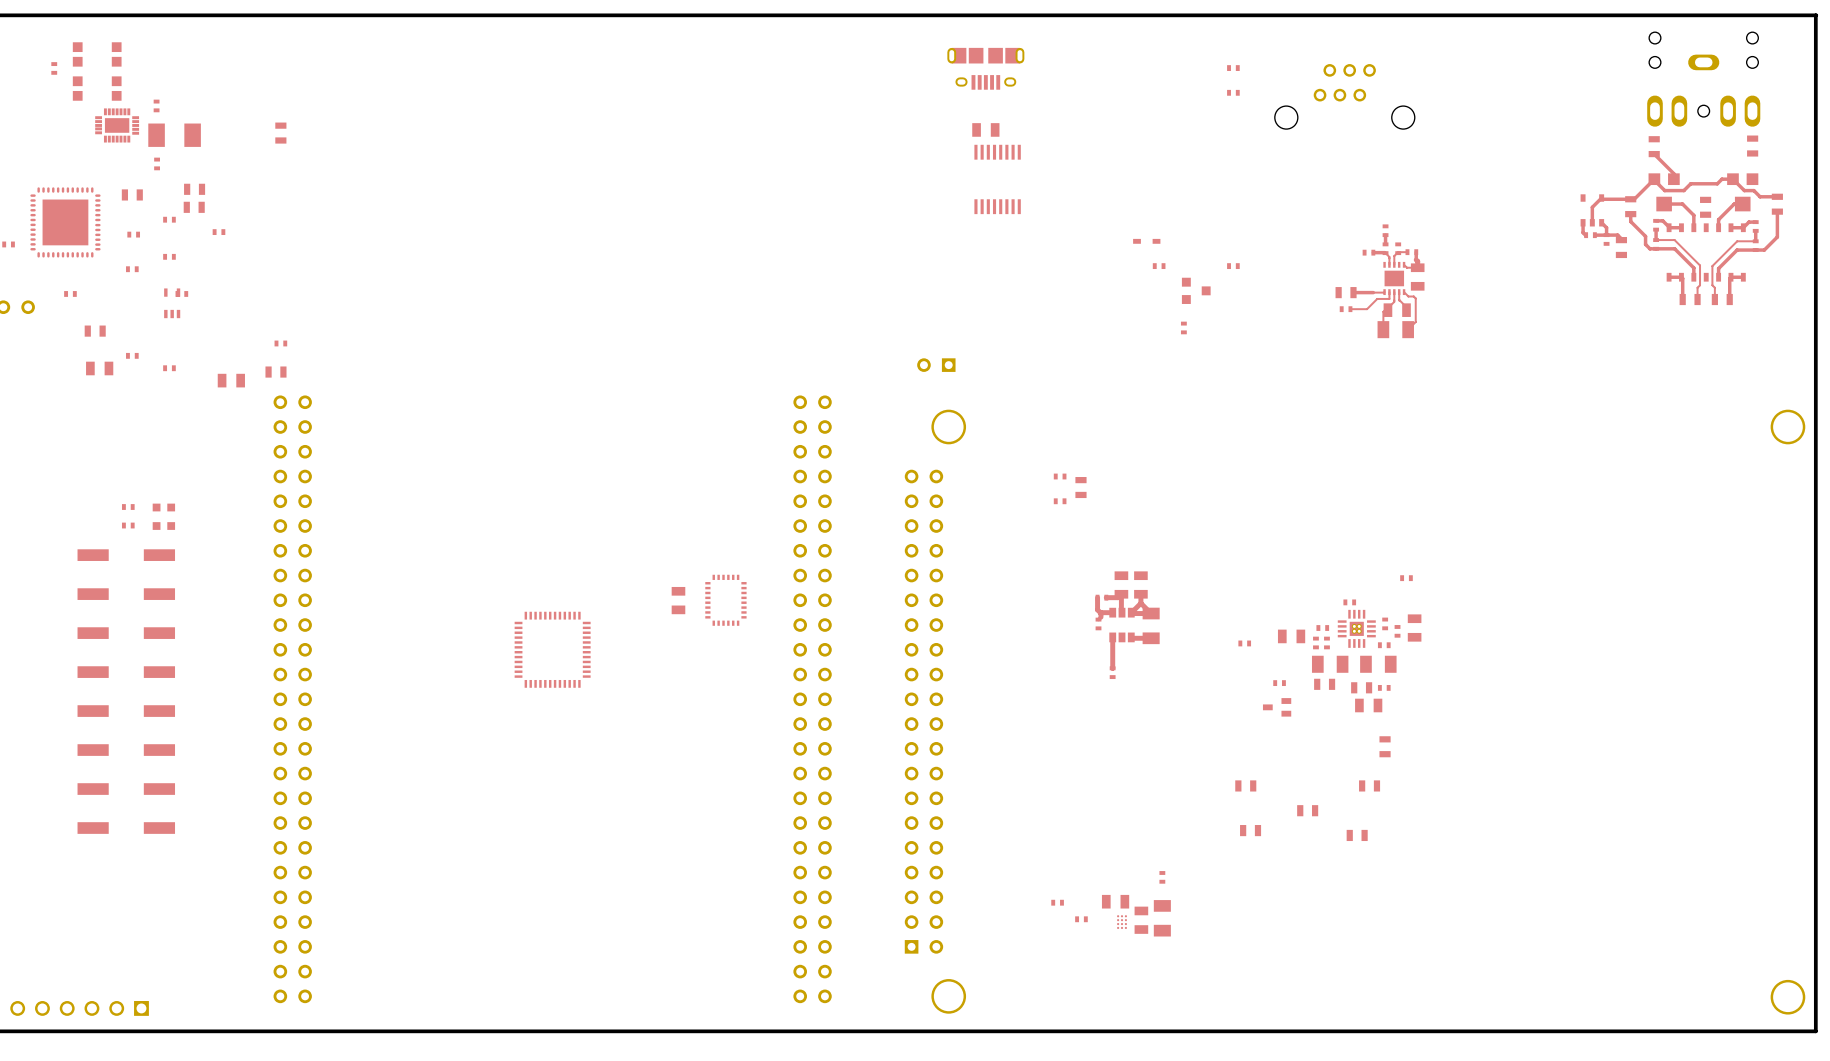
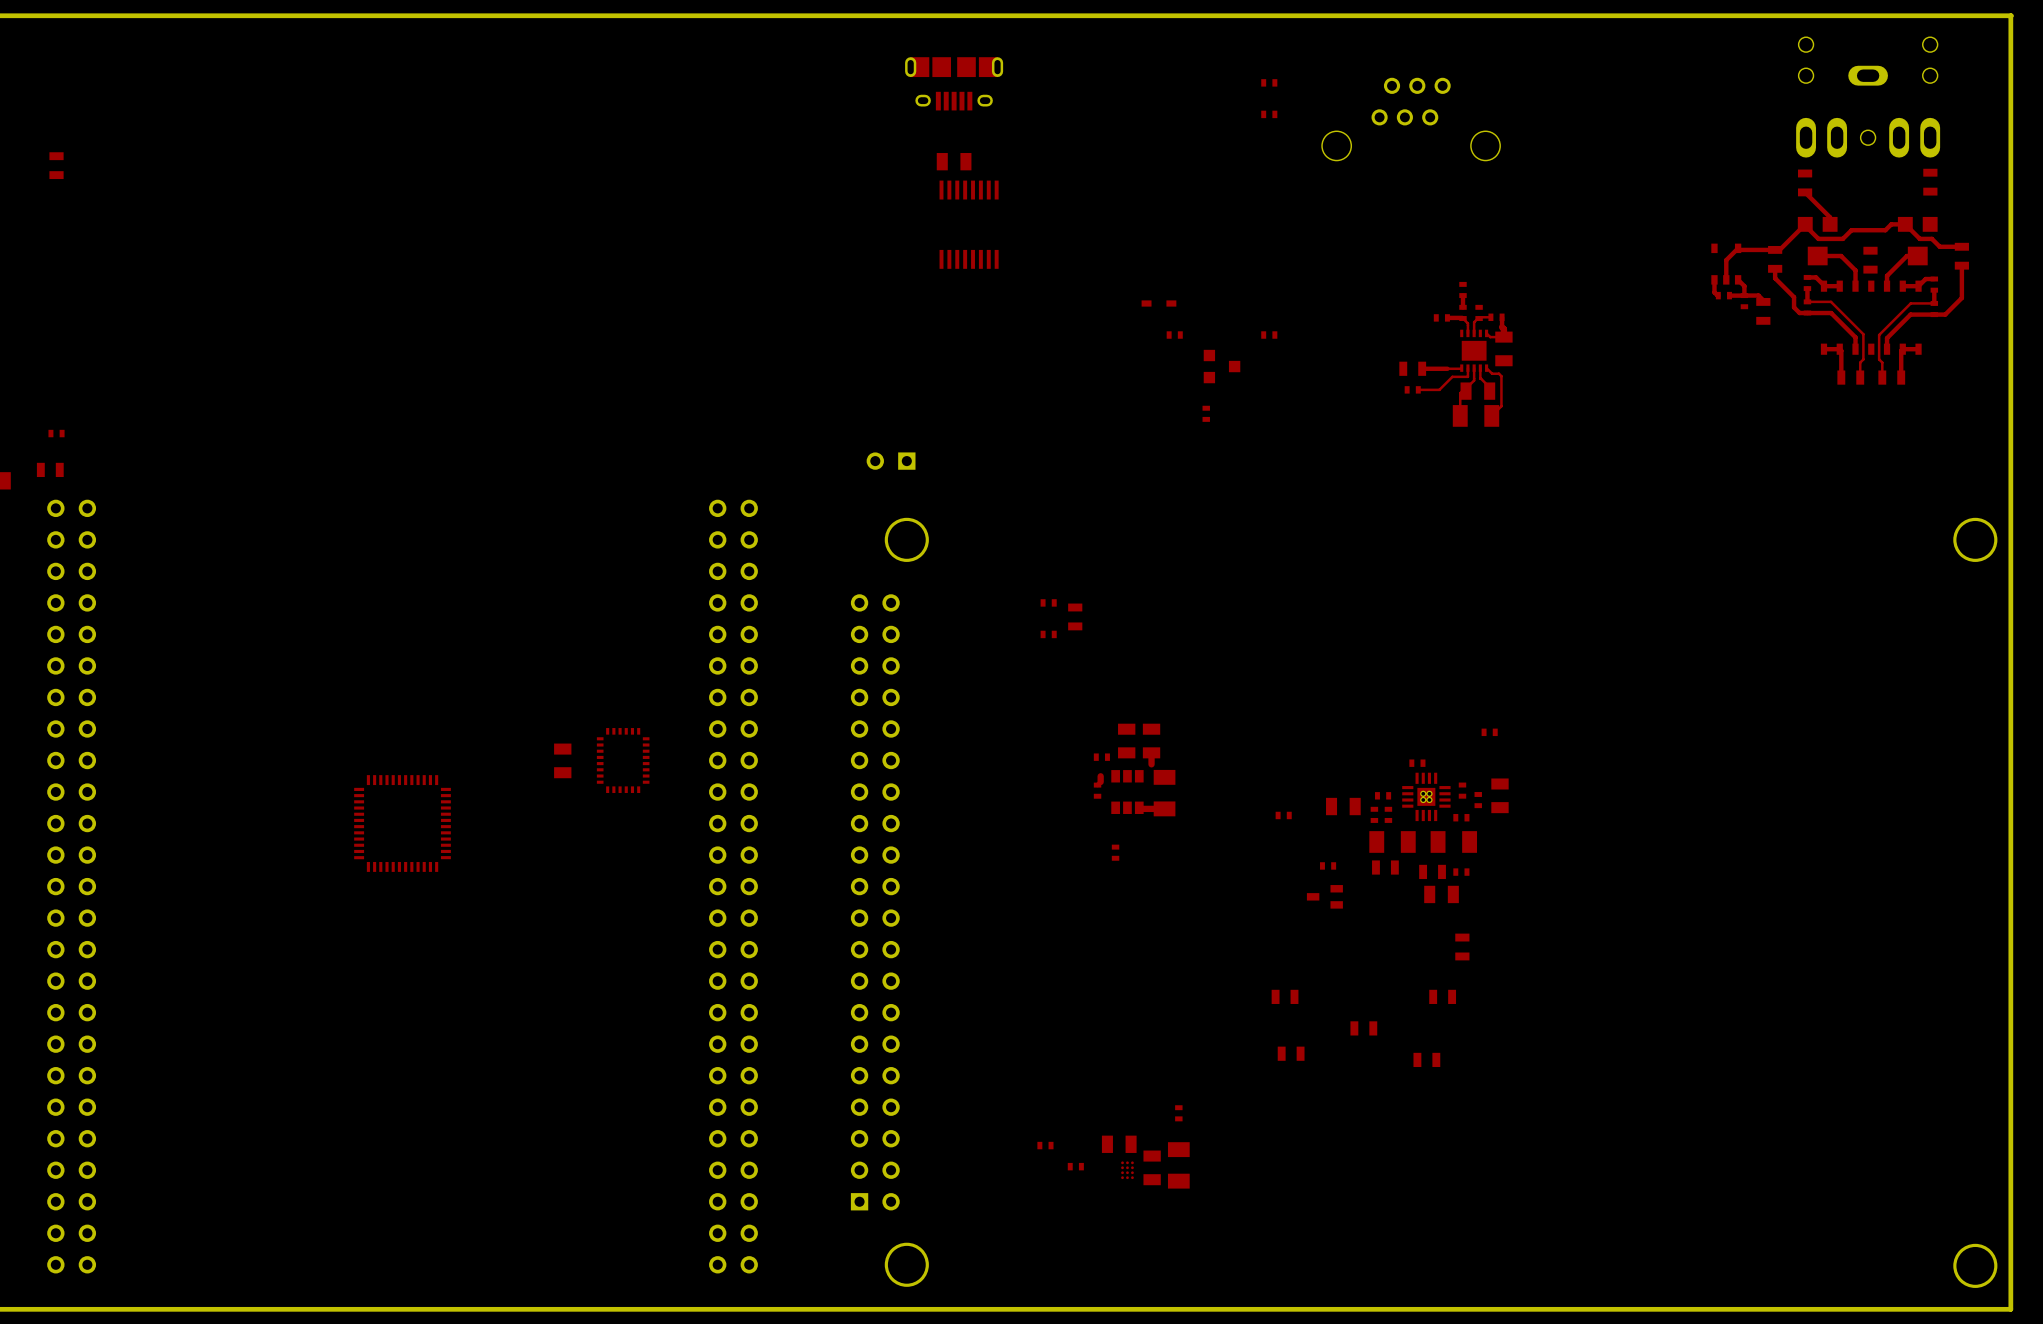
top track: (1097, 597) (1097, 609) (1100, 612) (1112, 612) -> none
top track: (1106, 597) (1118, 597) (1121, 594) (1122, 612) -> none
top track: (1140, 603) (1131, 612) (1151, 613) (1140, 603) -> none
top track: (1112, 637) (1112, 668) -> none

